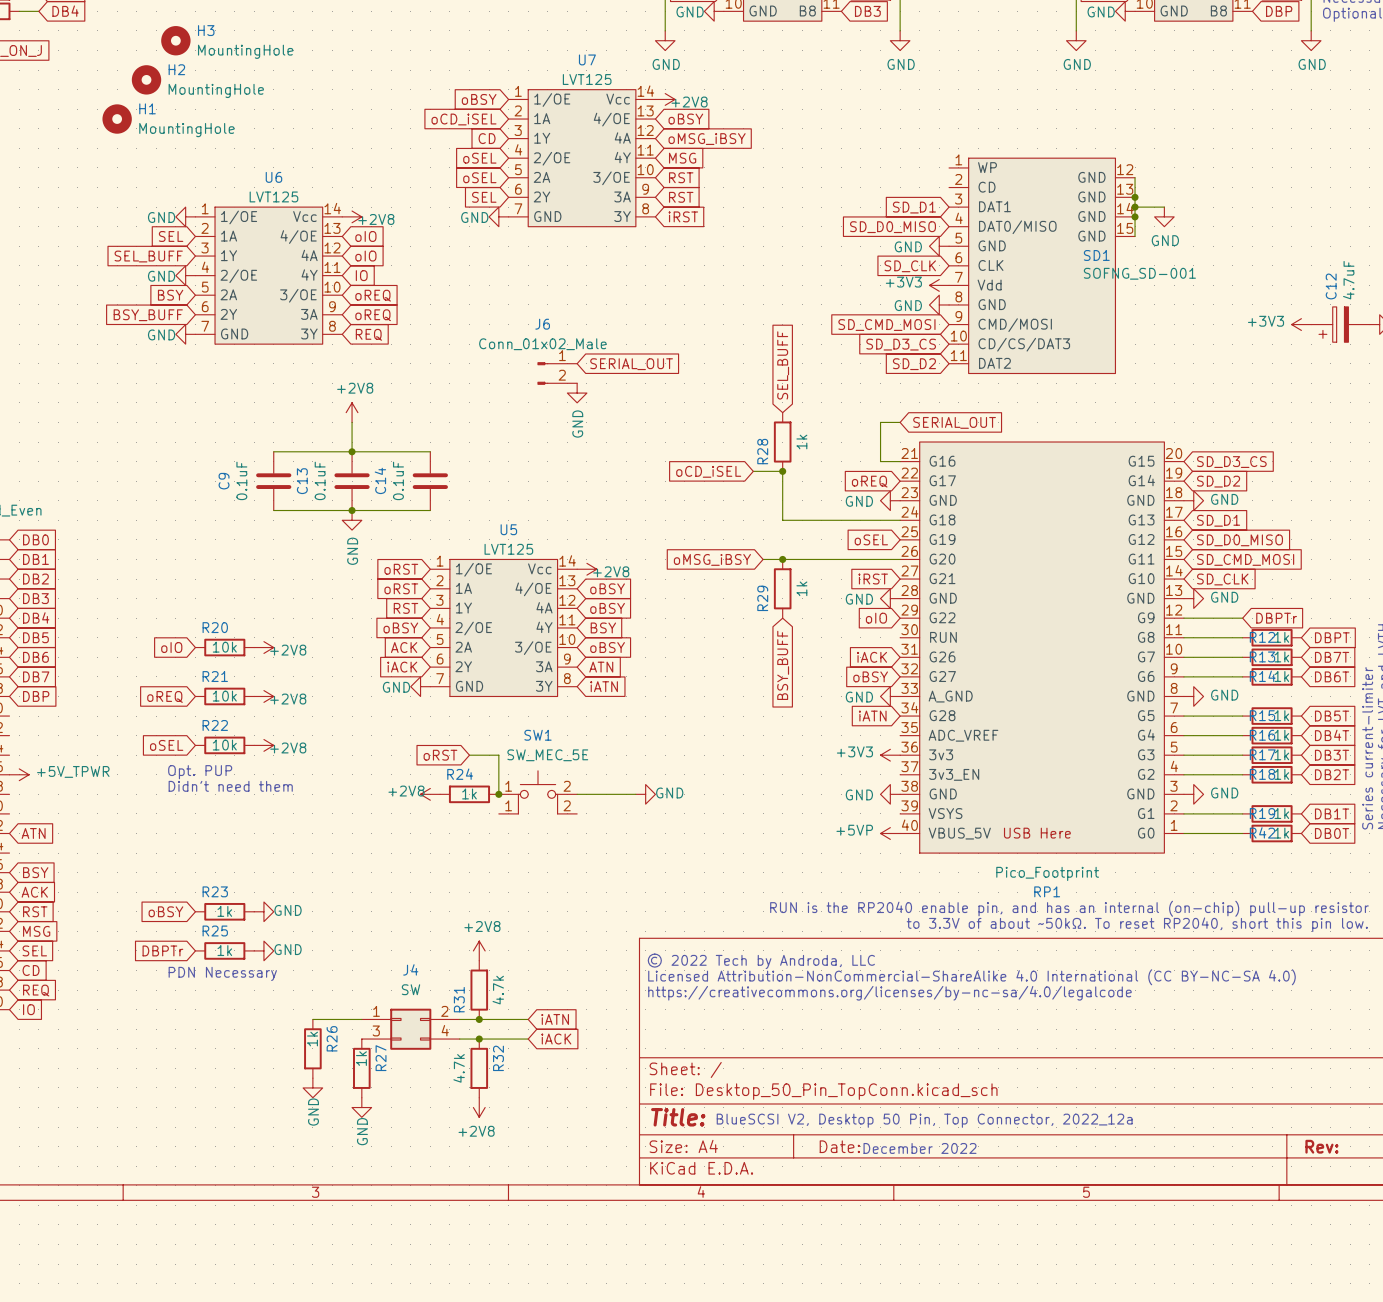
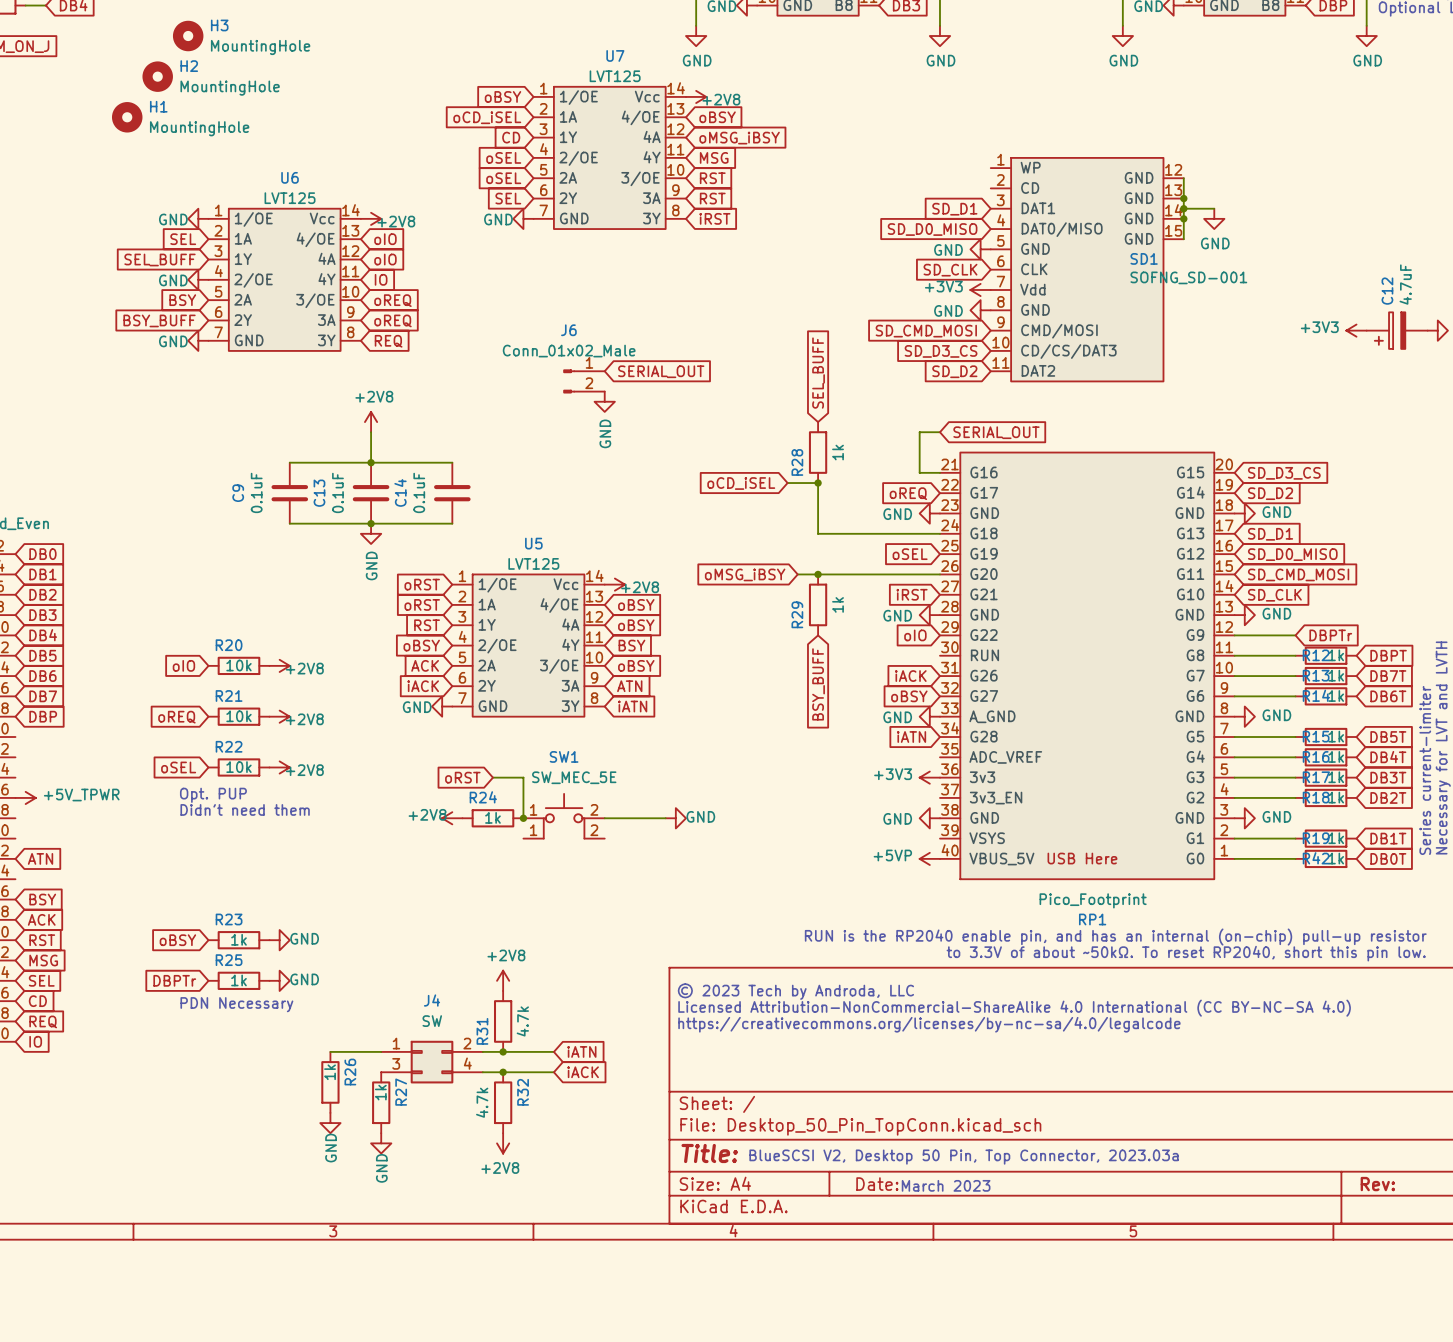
text: © 2022 Tech by Androda, LLC (761, 961) -> © 2023 Tech by Androda, LLC (795, 991)
text: BlueSCSI V2, Desktop 50 Pin, Top Connector, 2022_12a (924, 1120) -> BlueSCSI V2, Desktop 50 Pin, Top Connector, 2023.03a (964, 1157)
text: December 2022 (920, 1148) -> March 2023 (946, 1185)

